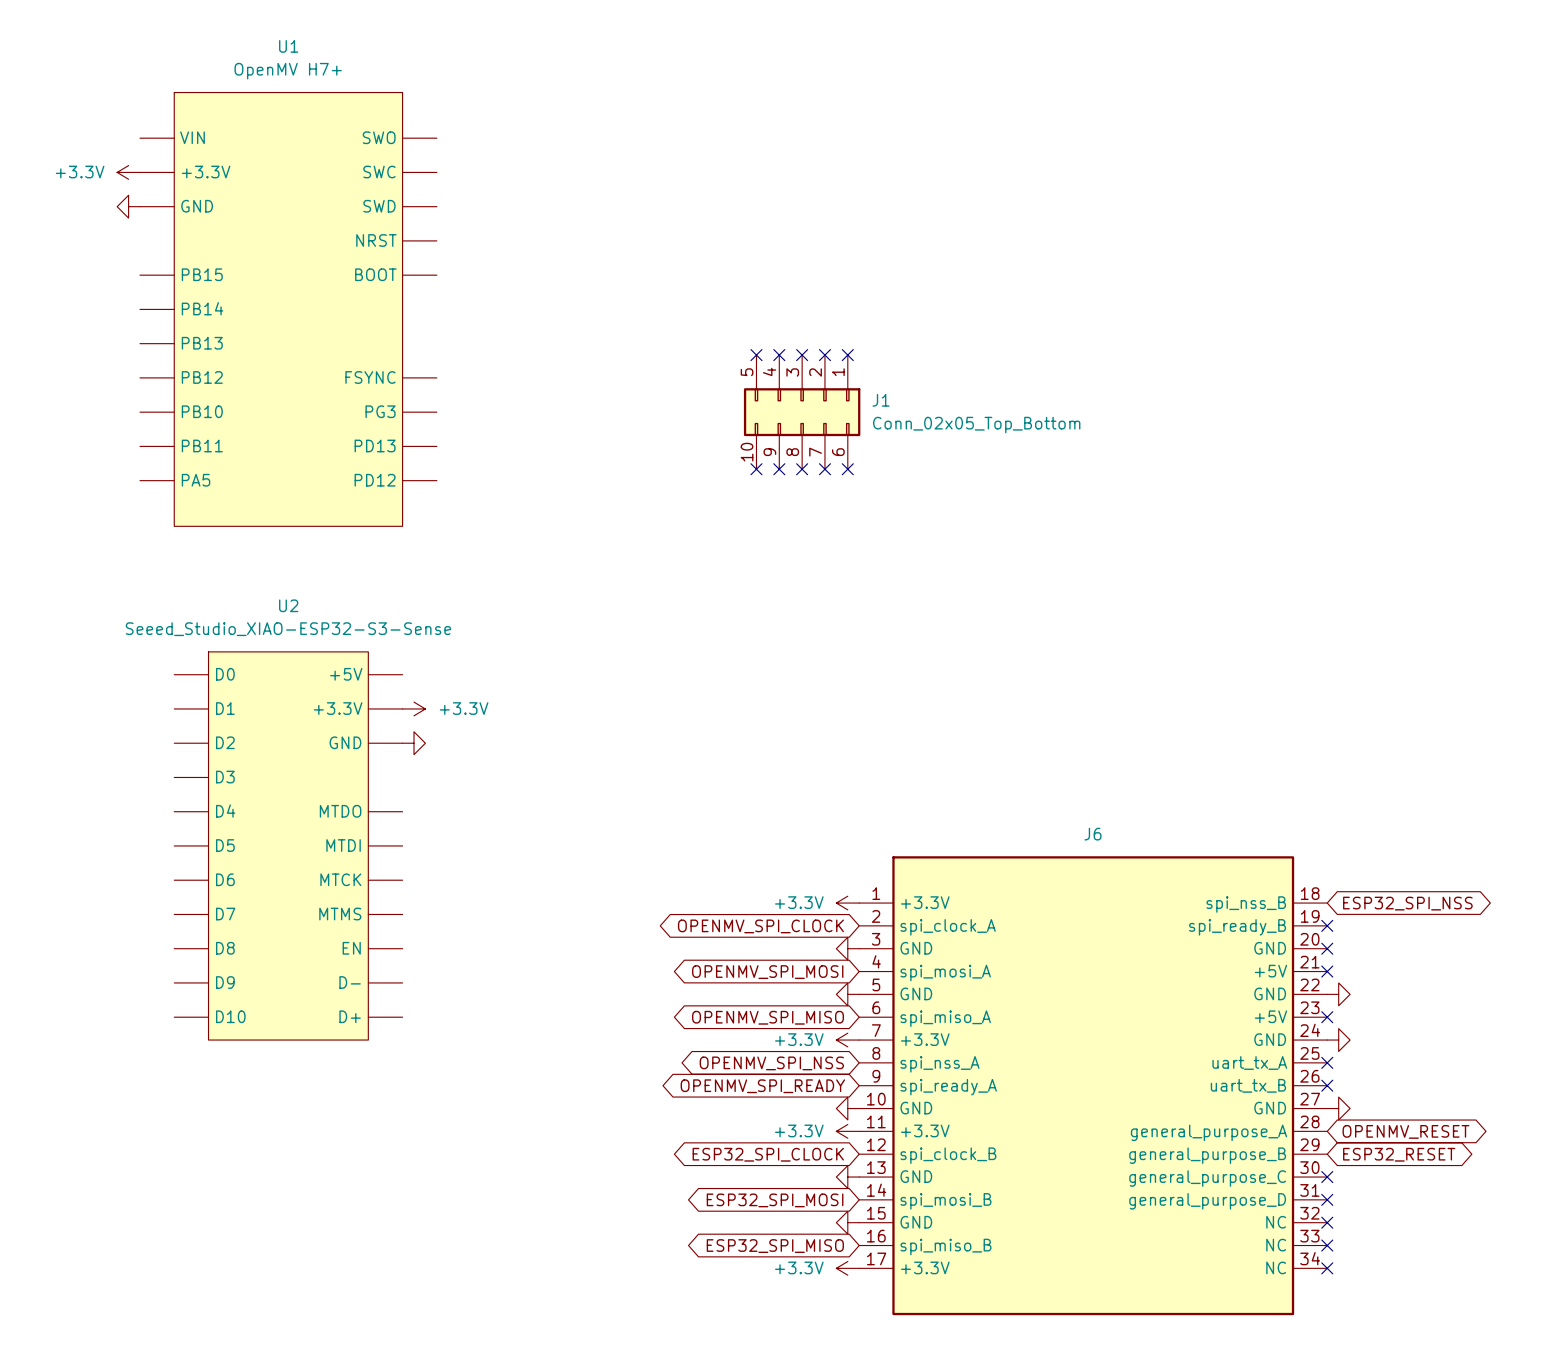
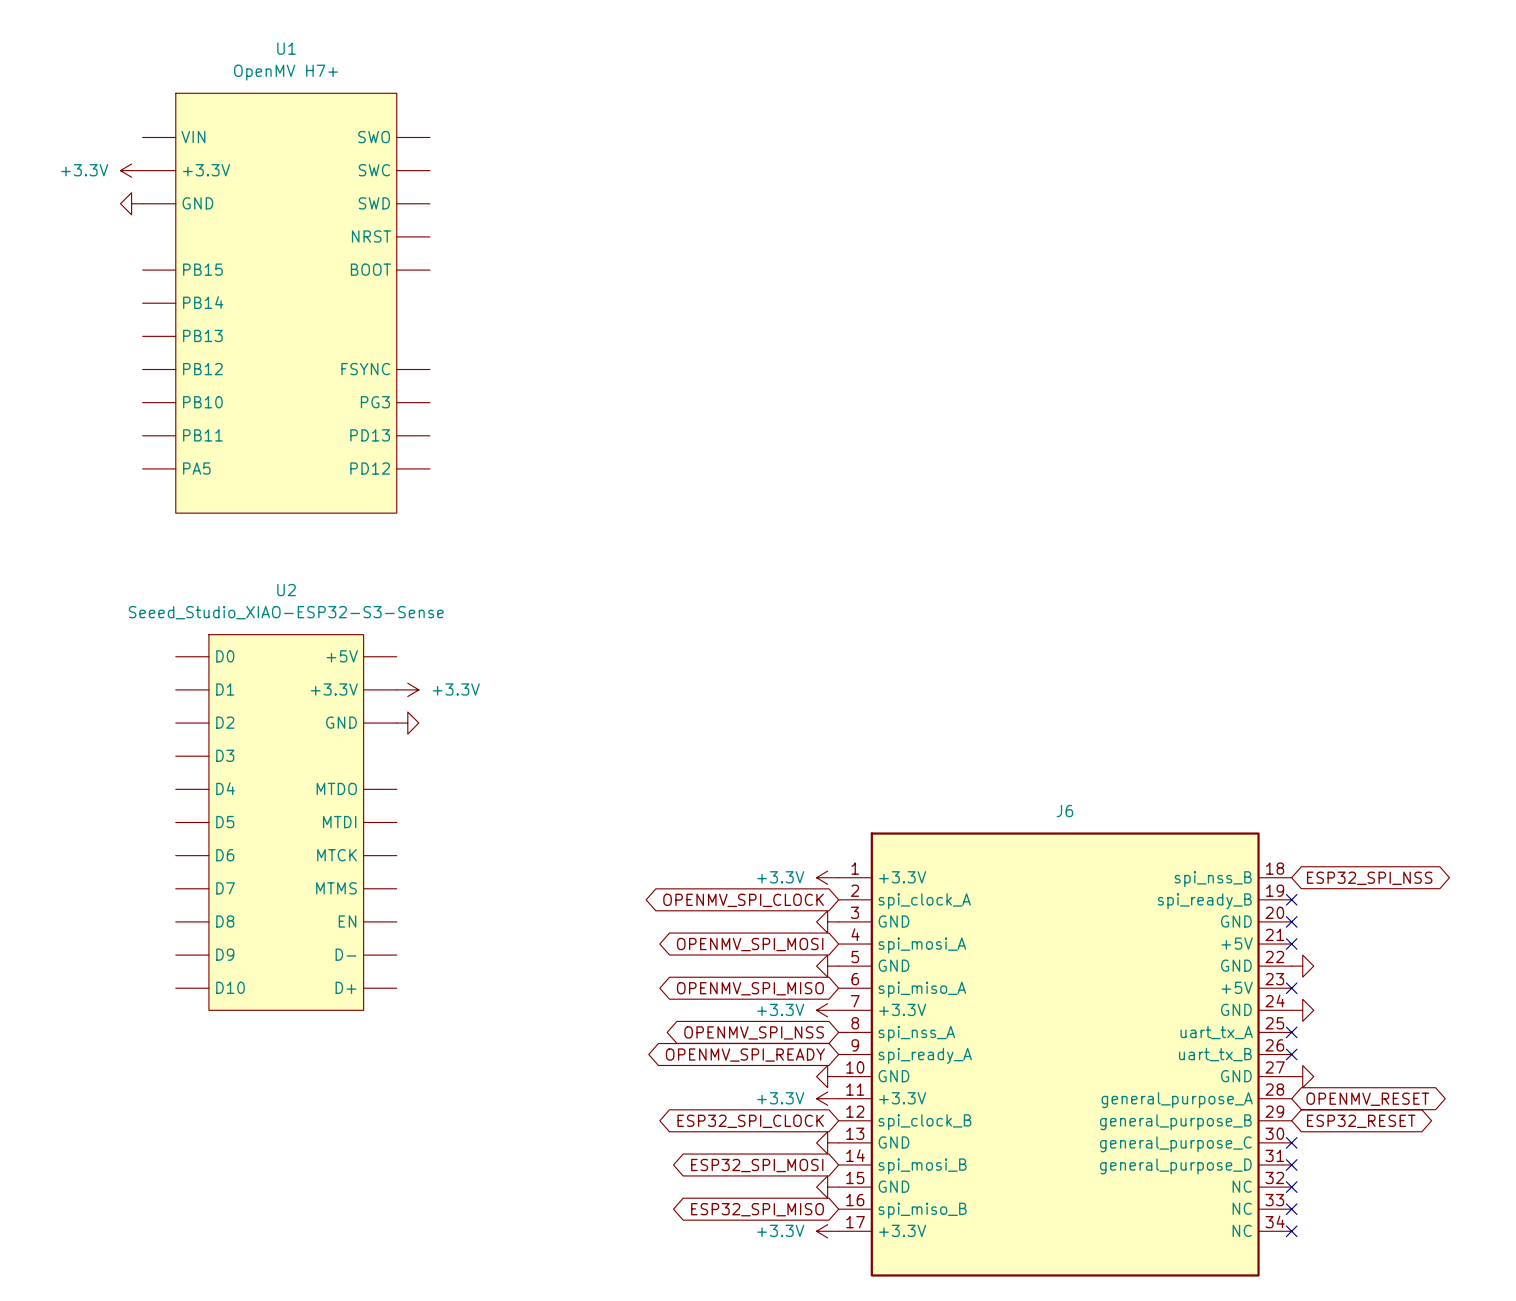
no-connect mark: (756, 355) -> none
no-connect mark: (779, 355) -> none
no-connect mark: (802, 355) -> none
no-connect mark: (824, 355) -> none
no-connect mark: (847, 355) -> none
J1: Conn_02x05_Top_Bottom (802, 412) -> none
no-connect mark: (756, 469) -> none
no-connect mark: (779, 469) -> none
no-connect mark: (802, 469) -> none
no-connect mark: (824, 469) -> none
no-connect mark: (847, 469) -> none

